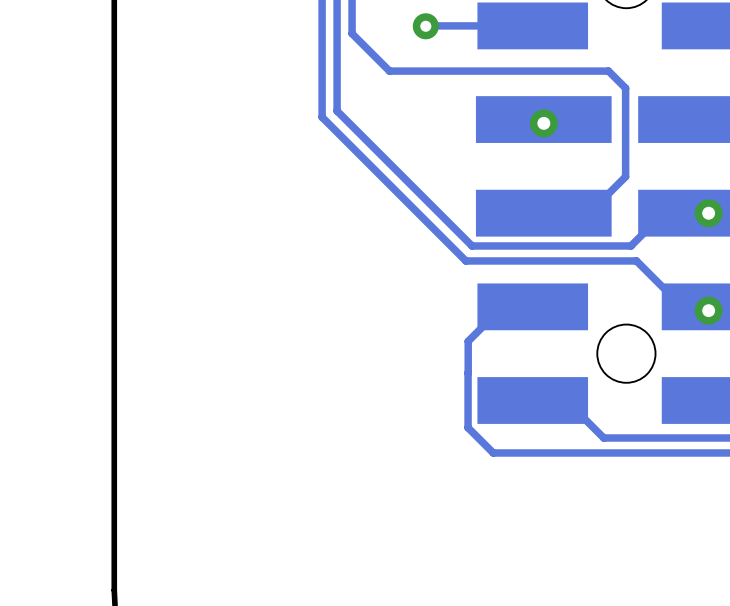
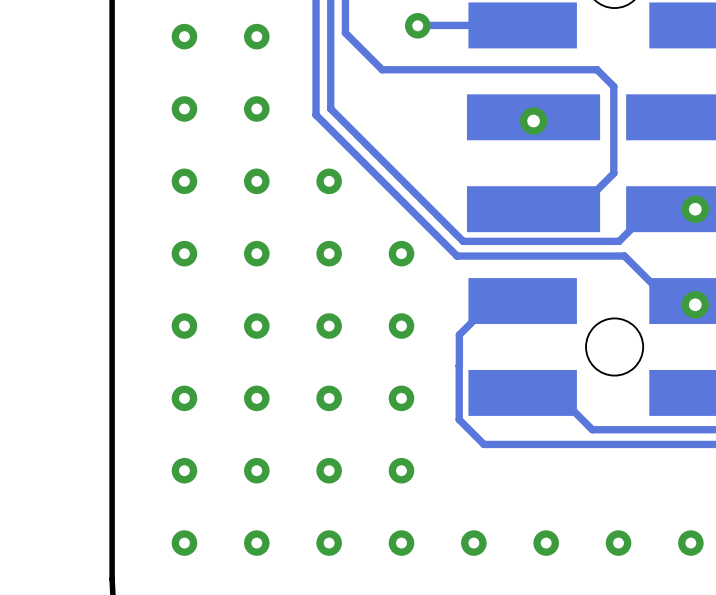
via: none -> (184, 36)
via: none -> (256, 36)
via: none -> (184, 108)
via: none -> (256, 108)
via: none -> (184, 181)
via: none -> (256, 181)
via: none -> (329, 181)
via: none -> (184, 253)
via: none -> (256, 253)
via: none -> (329, 253)
via: none -> (401, 253)
via: none -> (184, 326)
via: none -> (256, 326)
via: none -> (329, 326)
via: none -> (401, 326)
via: none -> (184, 398)
via: none -> (256, 398)
via: none -> (329, 398)
via: none -> (401, 398)
via: none -> (184, 470)
via: none -> (256, 470)
via: none -> (329, 470)
via: none -> (401, 470)
via: none -> (184, 543)
via: none -> (256, 543)
via: none -> (329, 543)
via: none -> (401, 543)
via: none -> (473, 543)
via: none -> (546, 543)
via: none -> (618, 543)
via: none -> (690, 543)

